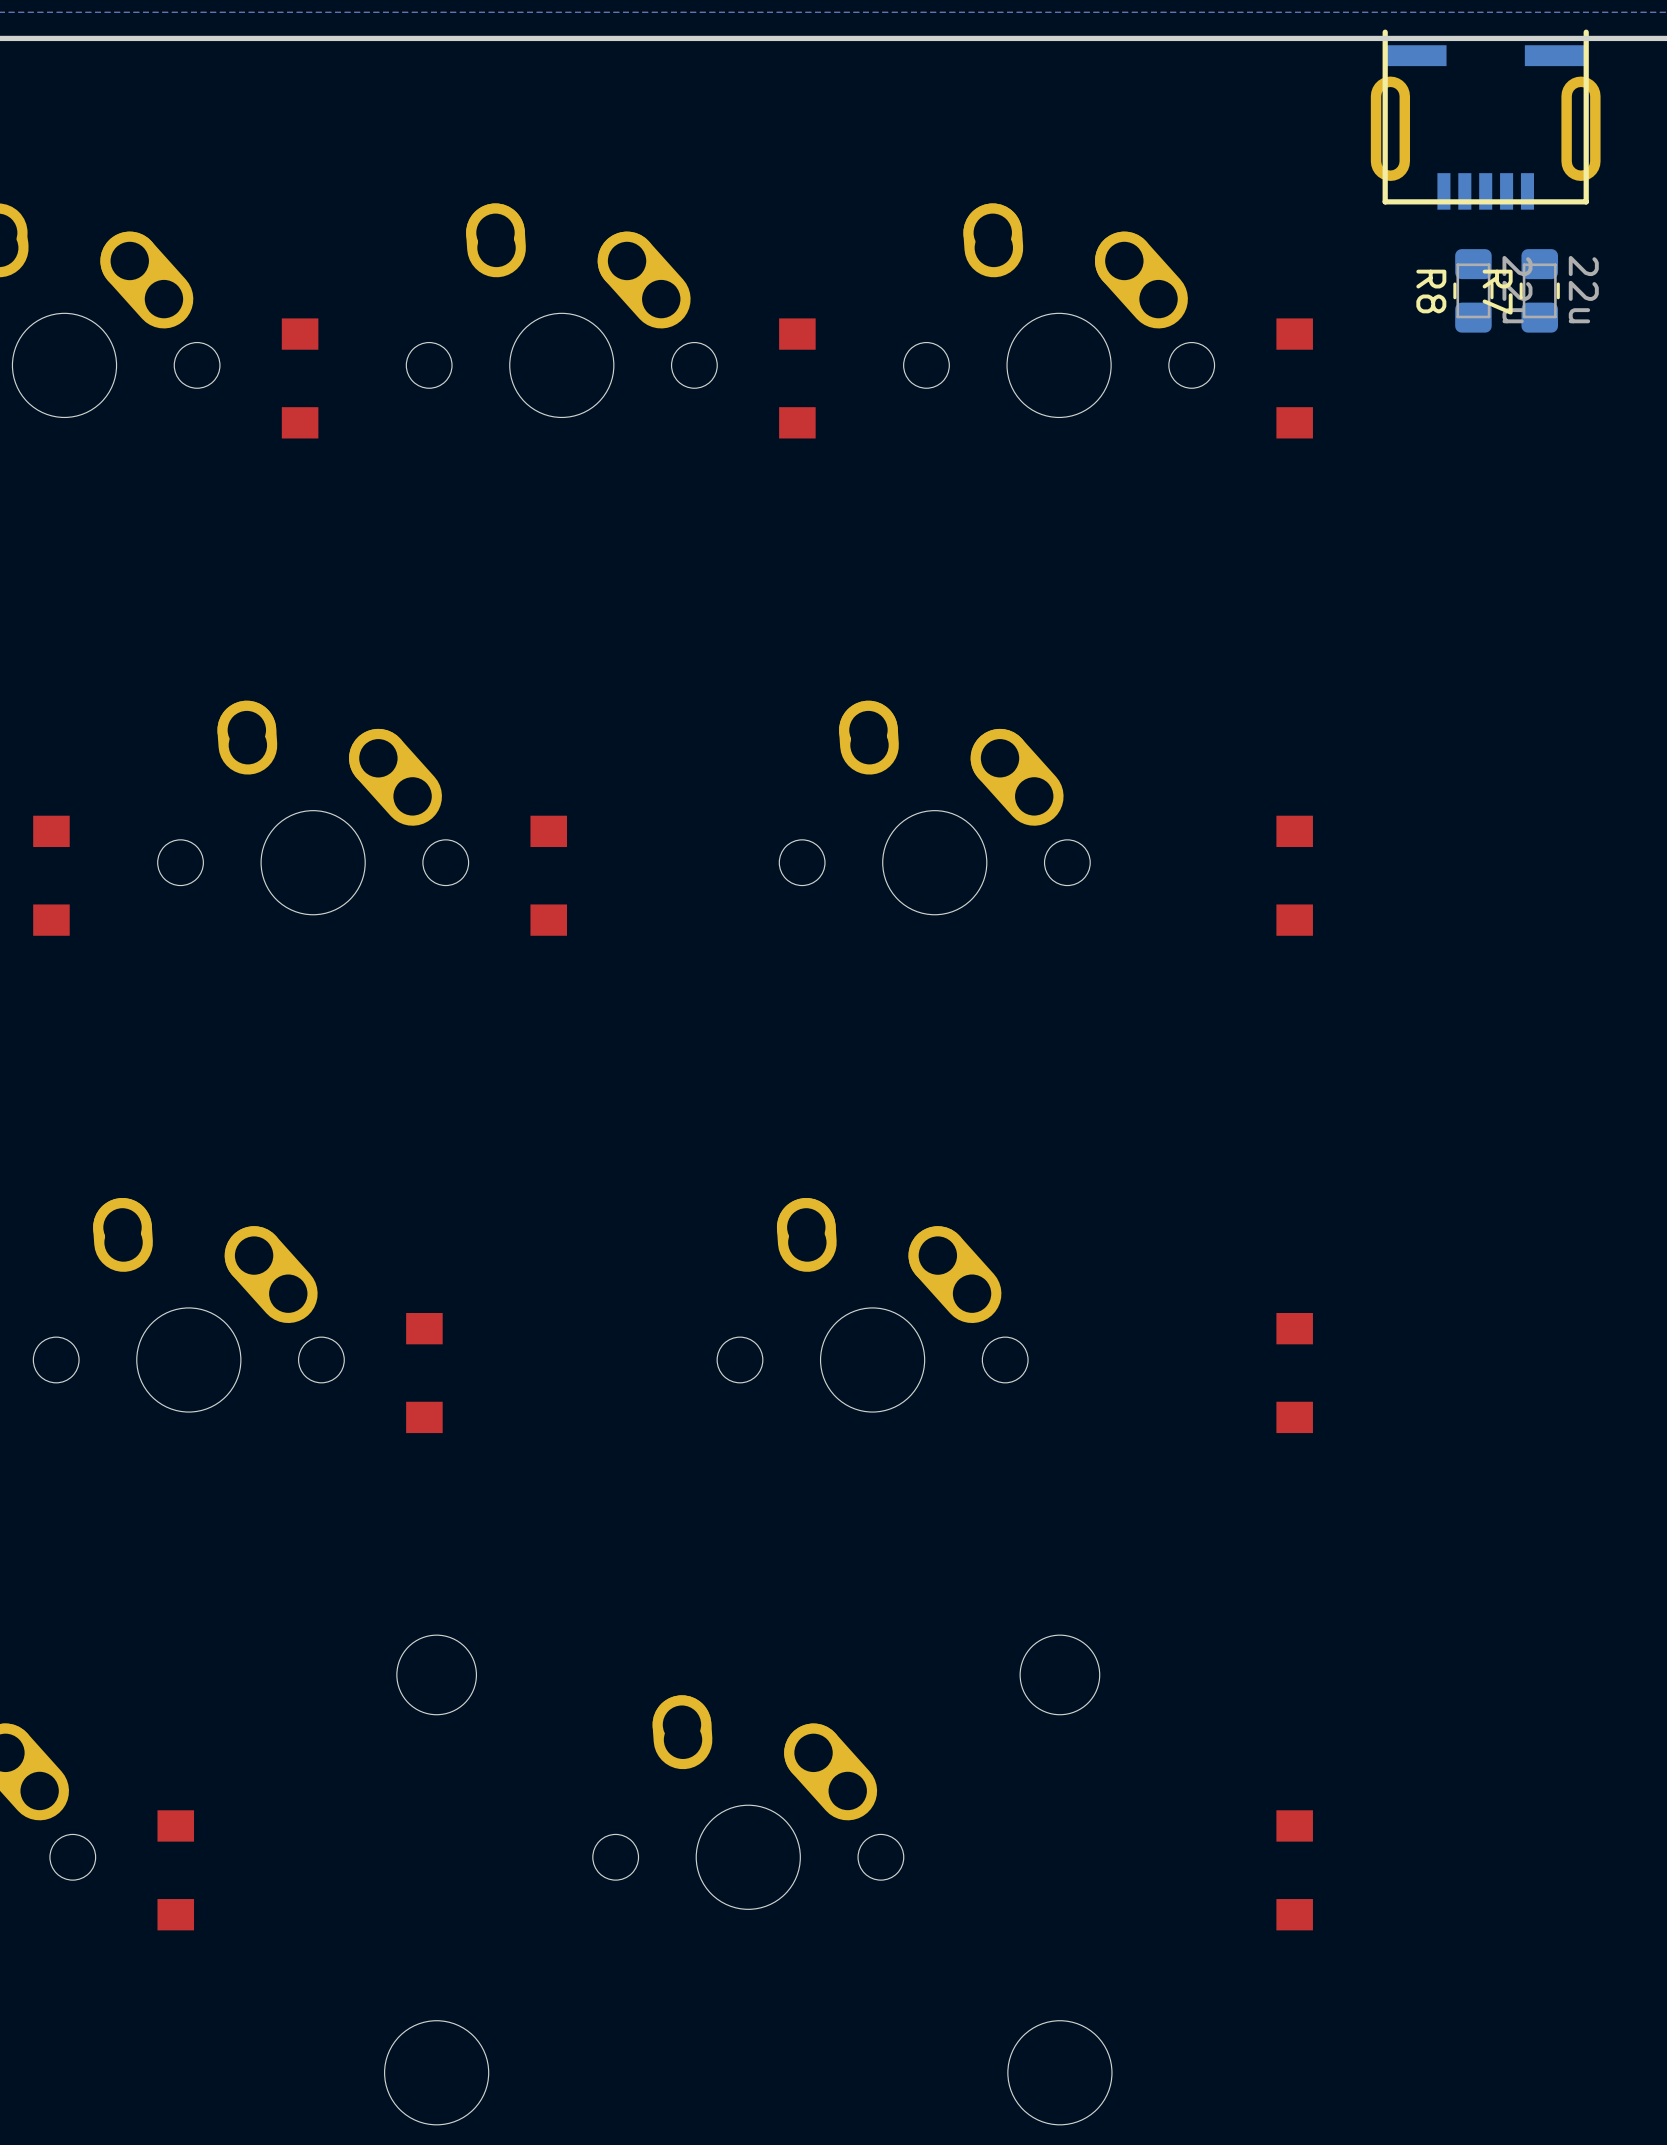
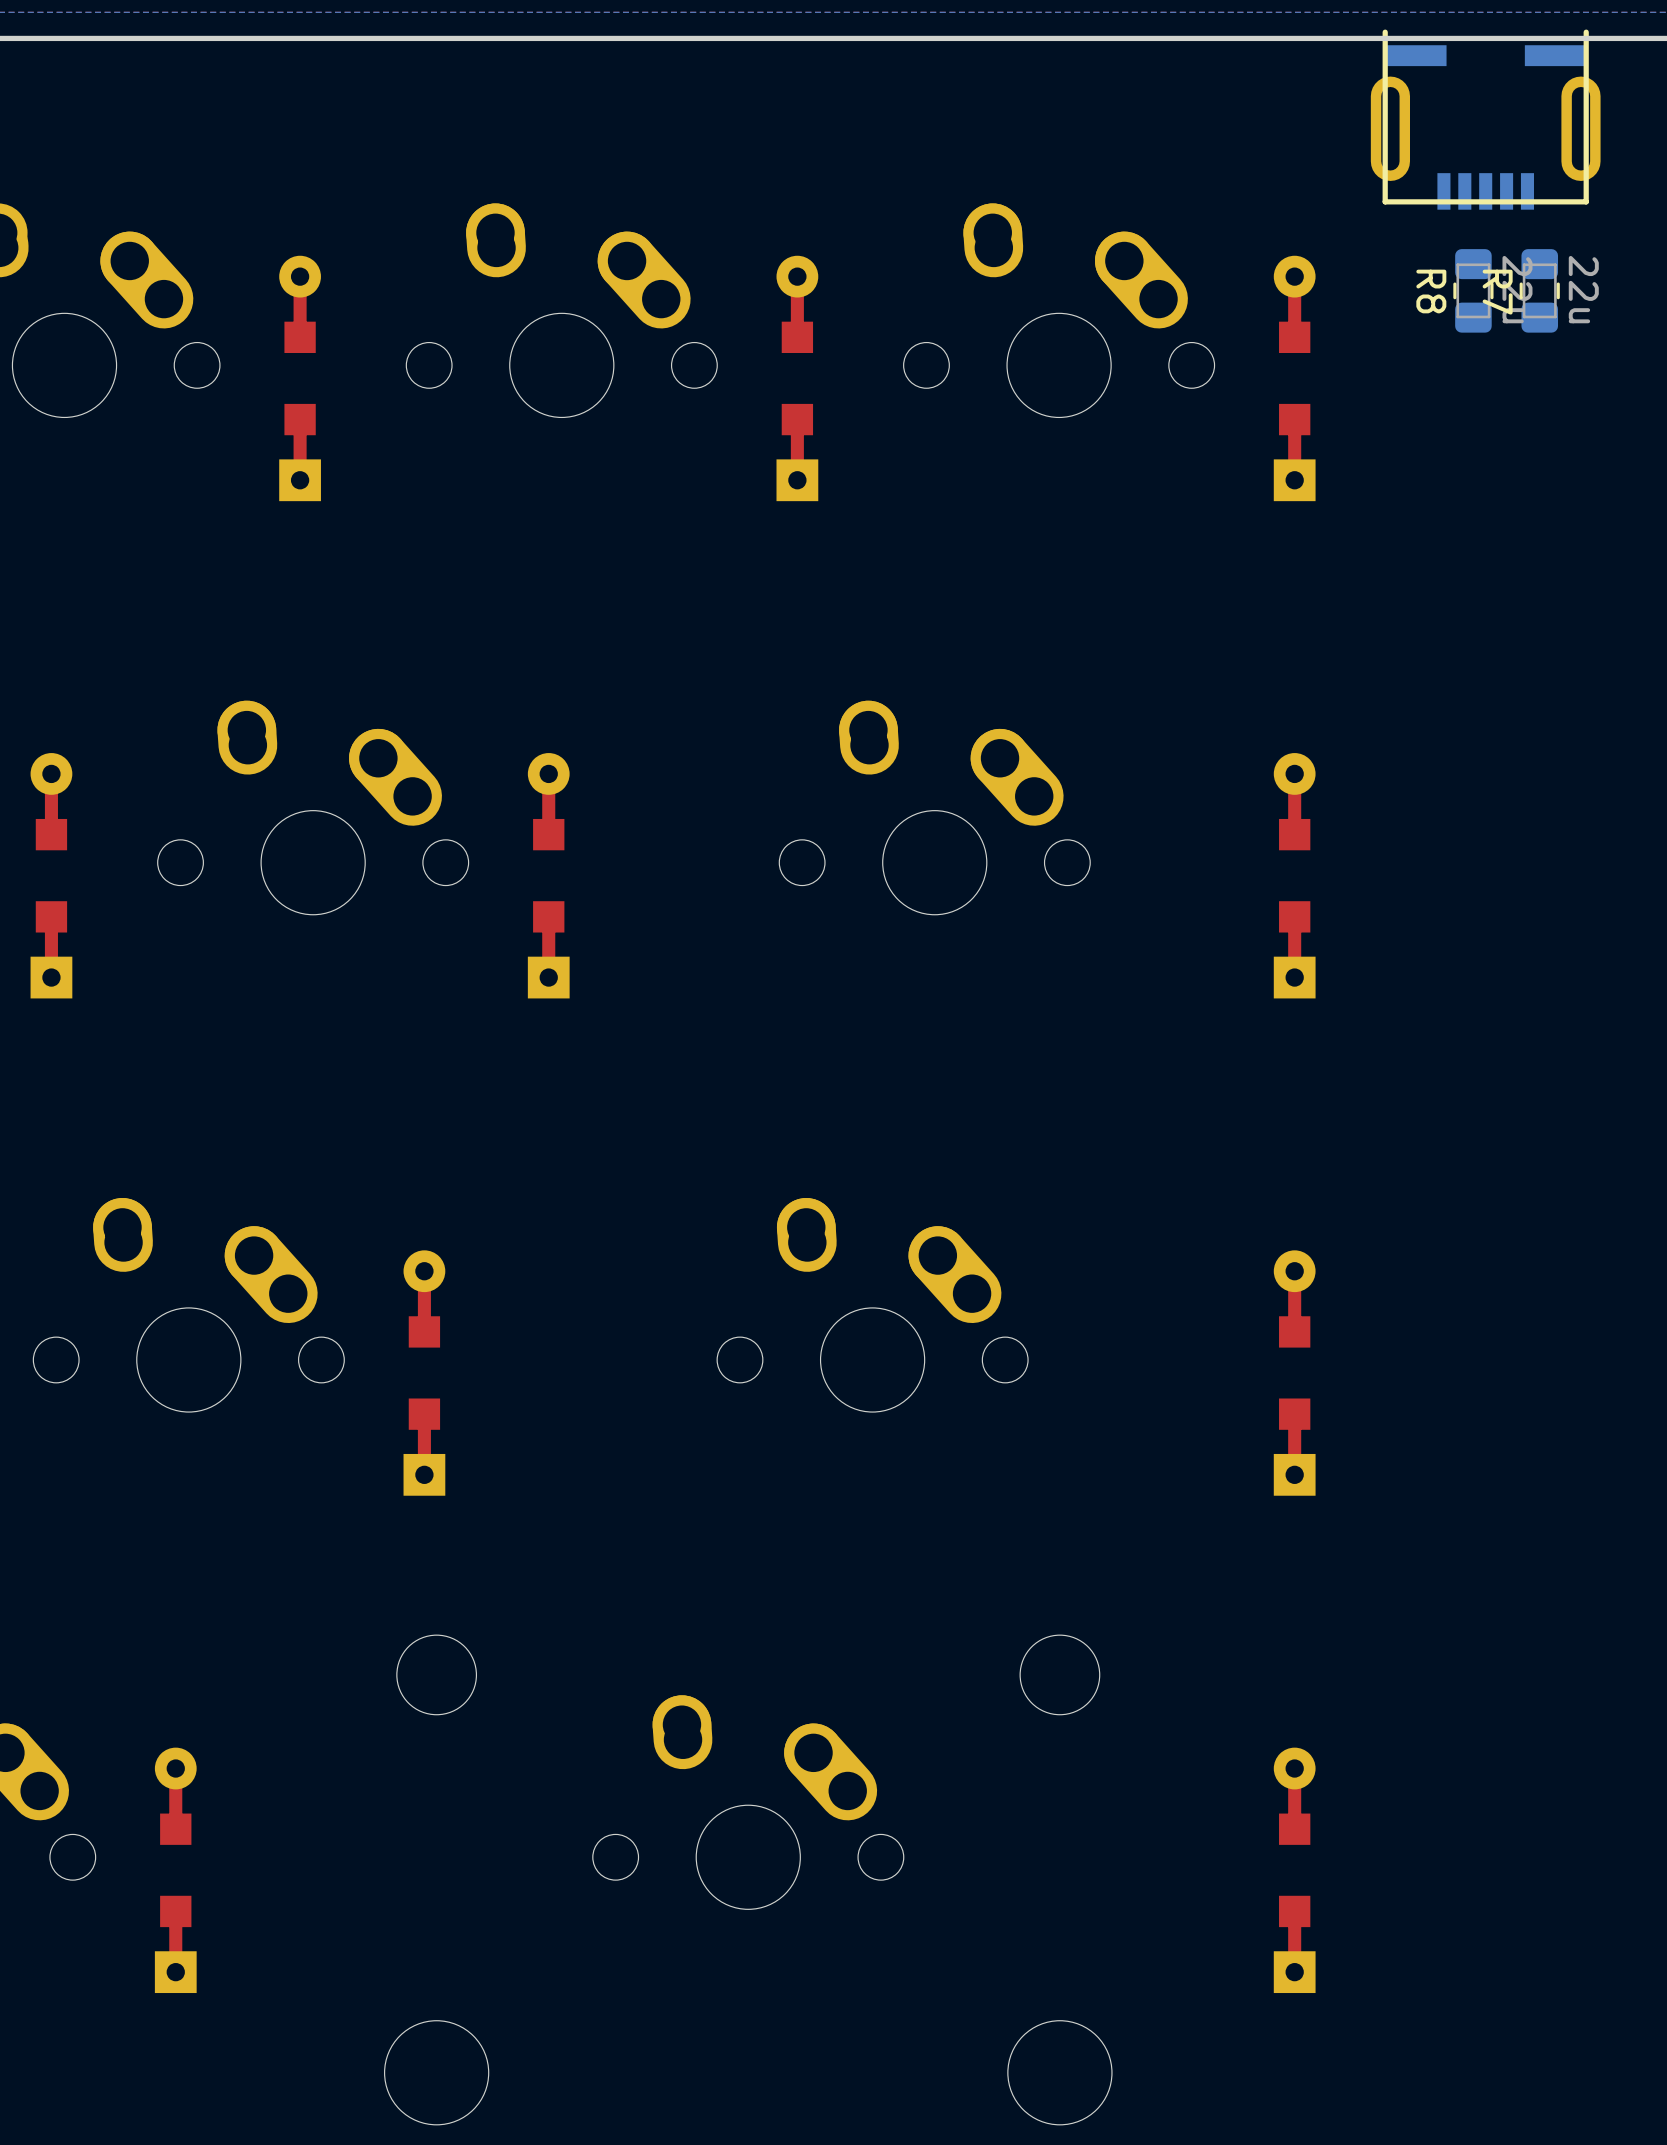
part footprint: [281, 318, 319, 439] -> [279, 255, 321, 502]
part footprint: [779, 318, 816, 439] -> [776, 255, 819, 502]
part footprint: [1276, 318, 1313, 439] -> [1273, 255, 1316, 502]
part footprint: [33, 815, 70, 936] -> [30, 753, 73, 999]
part footprint: [530, 815, 568, 936] -> [527, 753, 570, 999]
part footprint: [1276, 815, 1313, 936] -> [1273, 753, 1316, 999]
part footprint: [406, 1313, 443, 1434] -> [403, 1250, 446, 1496]
part footprint: [1276, 1313, 1313, 1434] -> [1273, 1250, 1316, 1496]
part footprint: [157, 1810, 195, 1931] -> [154, 1747, 197, 1994]
part footprint: [1276, 1810, 1313, 1931] -> [1273, 1747, 1316, 1994]

